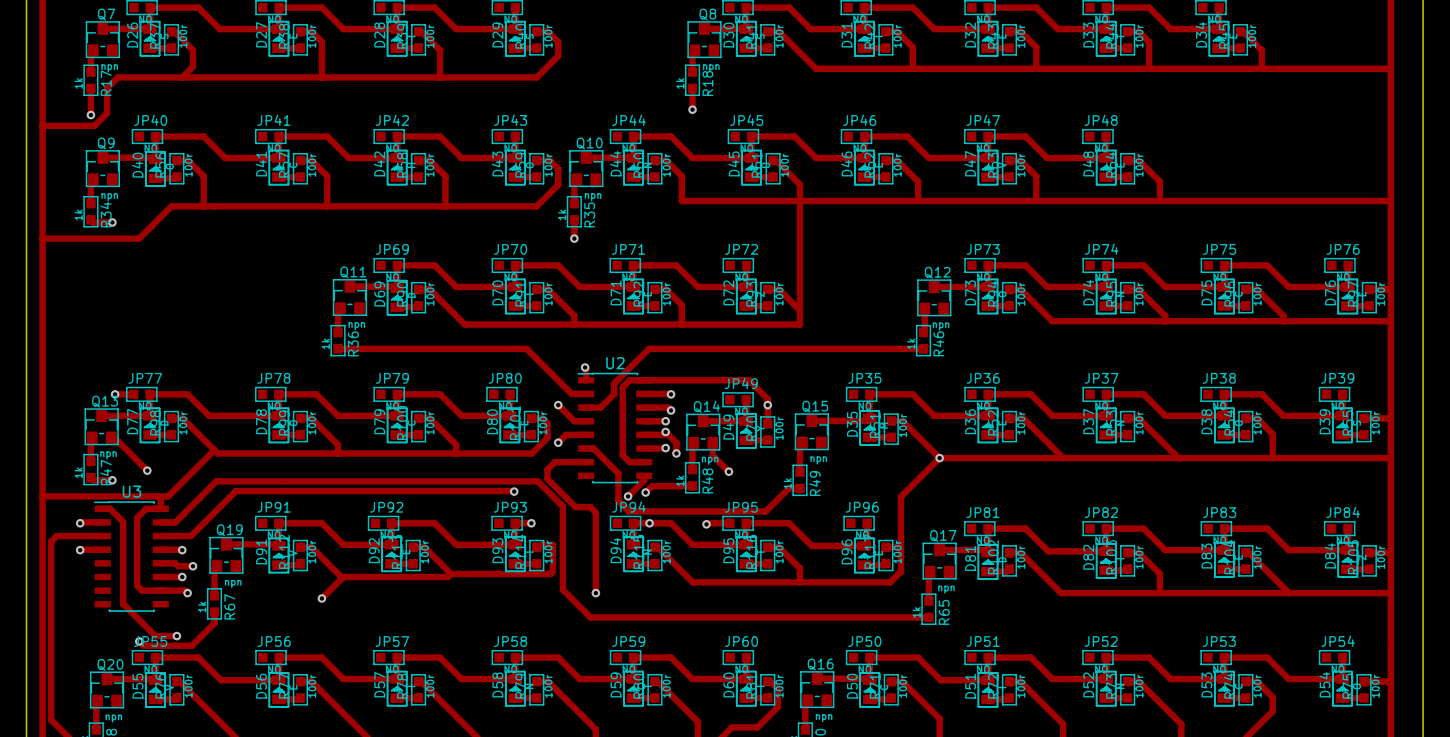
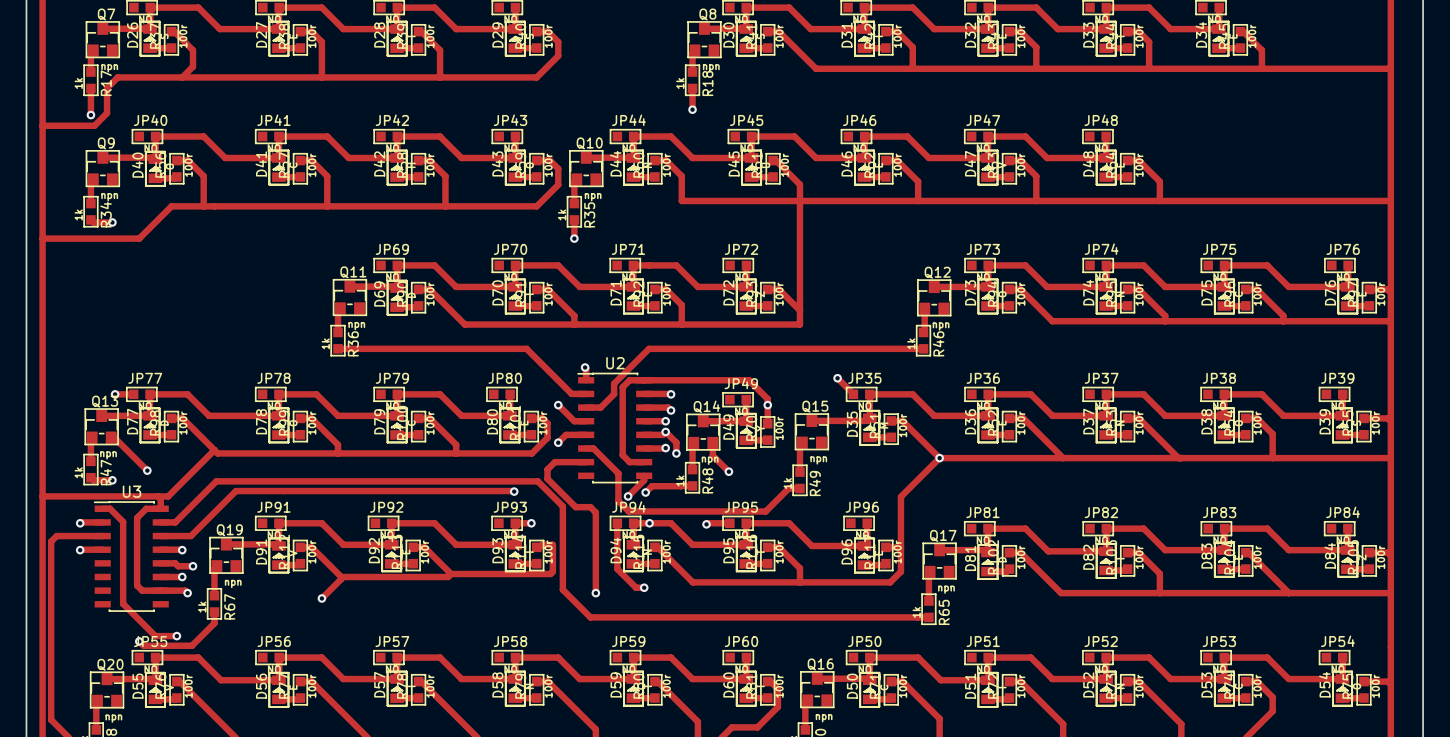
track: none -> (837, 378) (853, 394)
via: none -> (837, 378)
track: none -> (617, 523) (617, 569) (636, 587) (644, 587)
via: none -> (644, 587)

